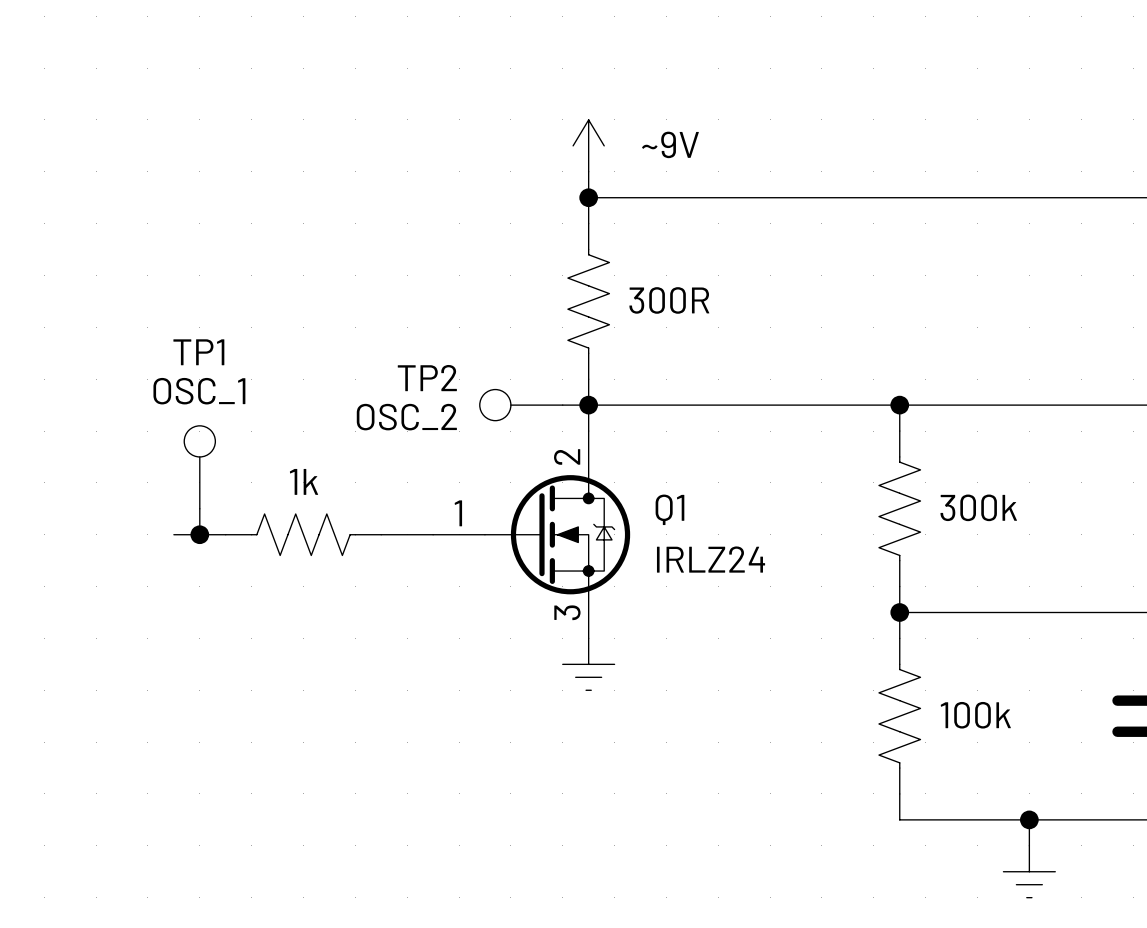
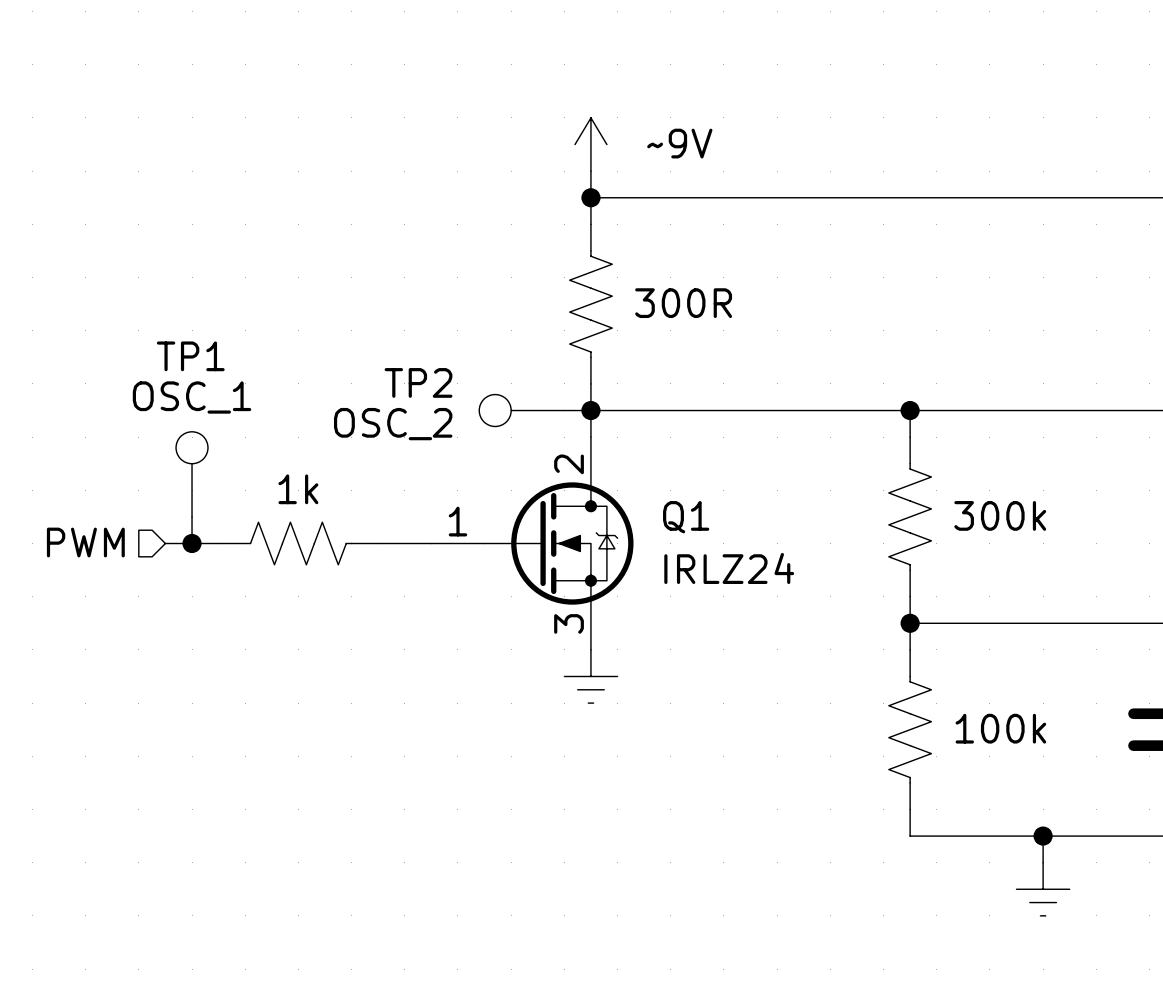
hierarchical label: none -> PWM (85, 542)

